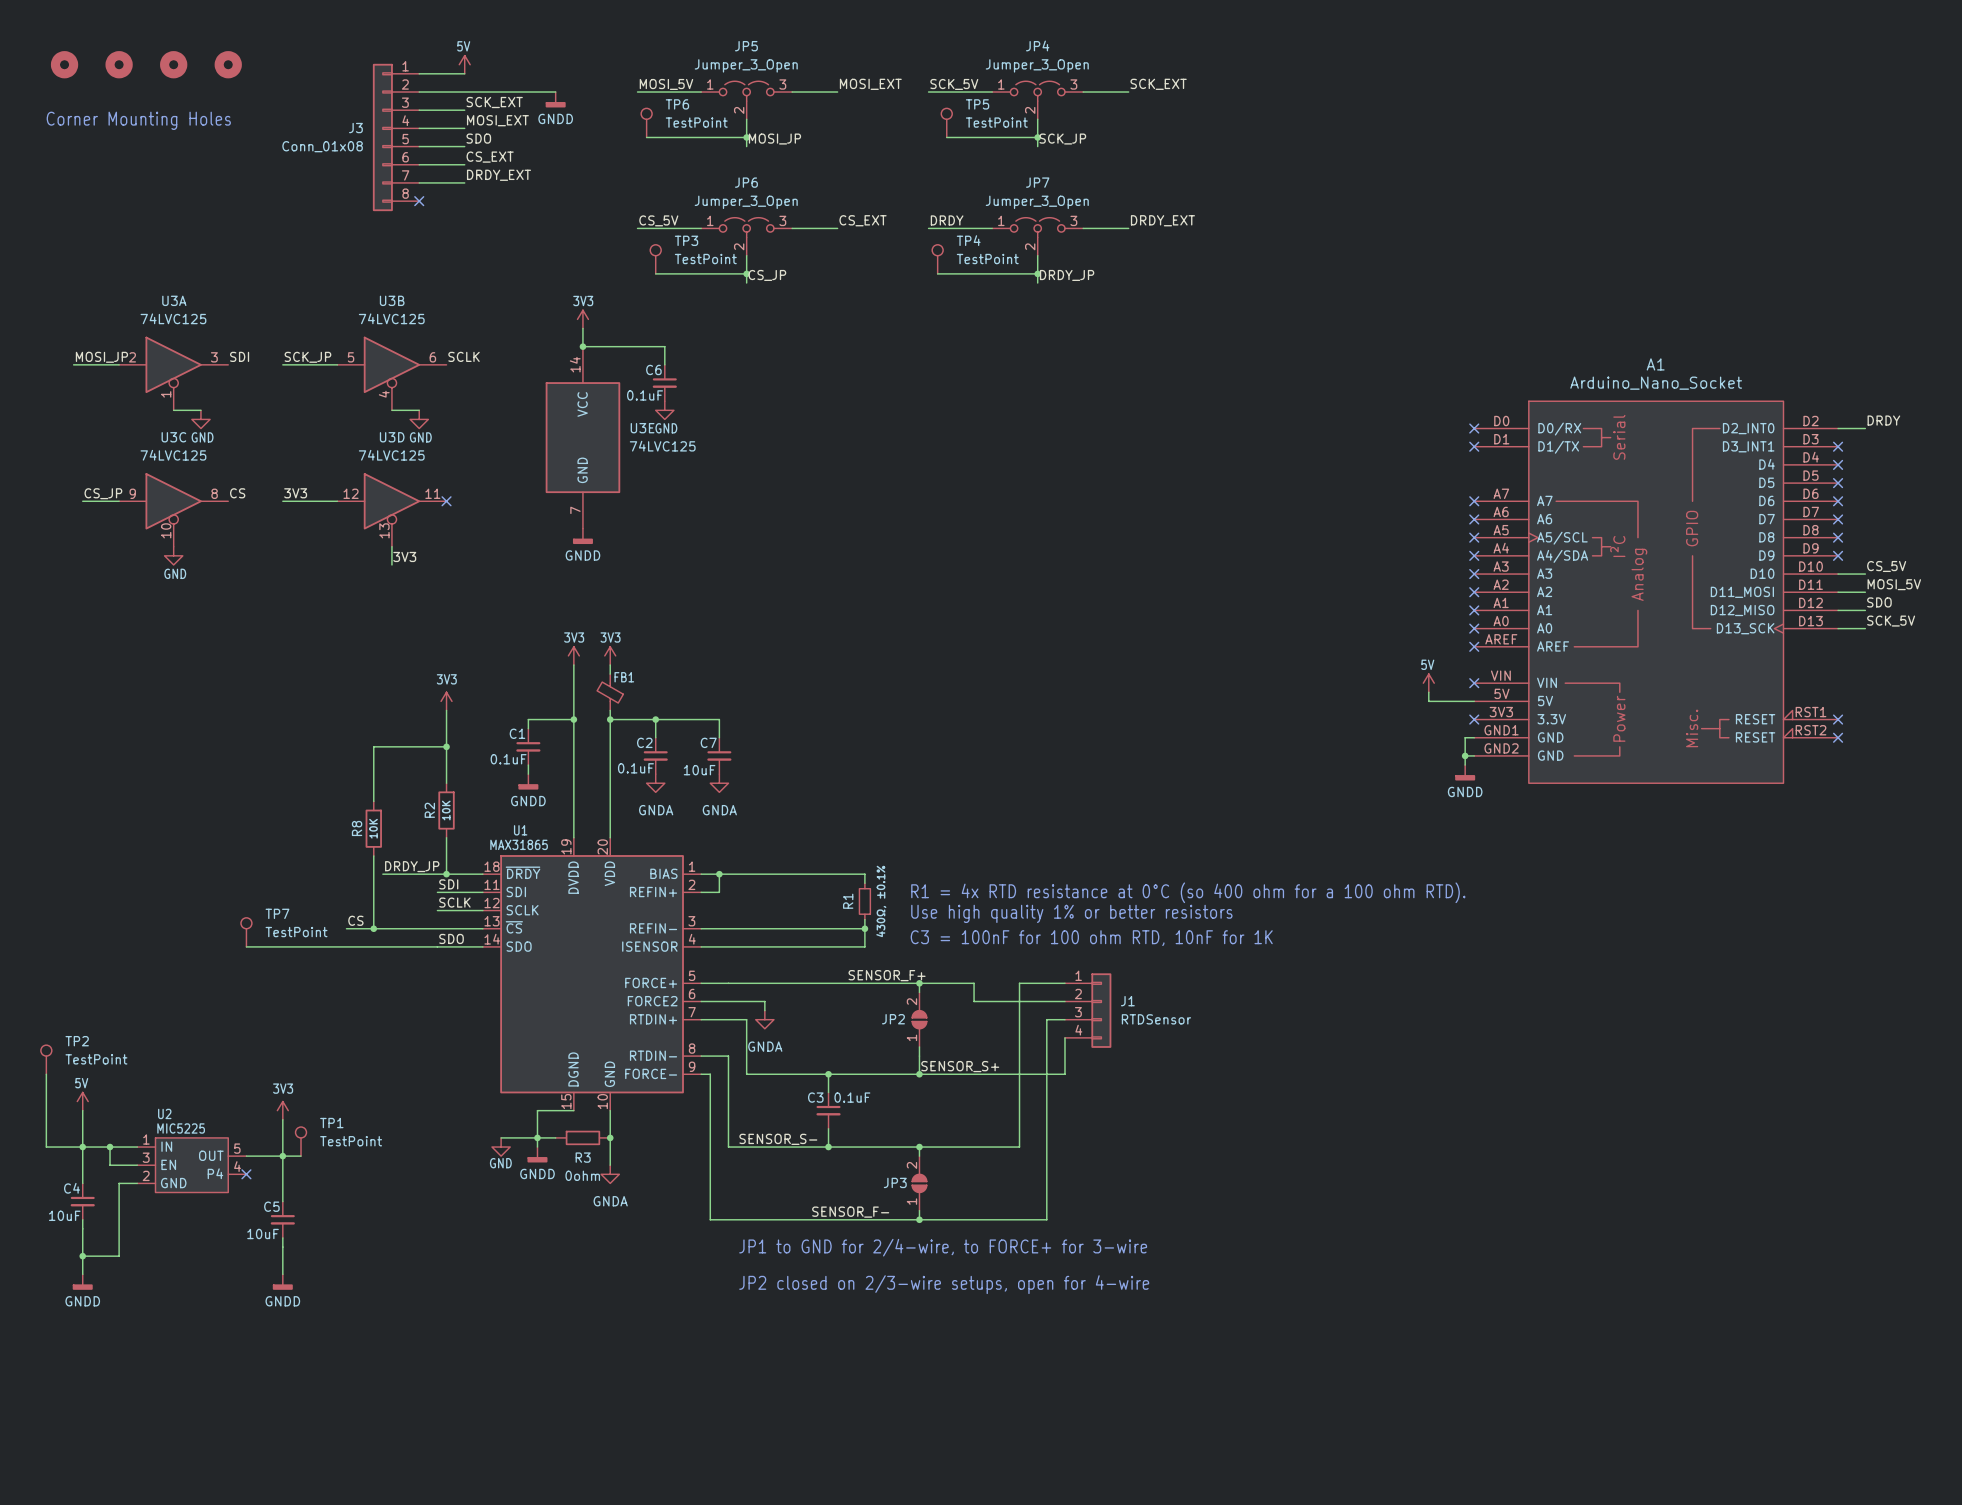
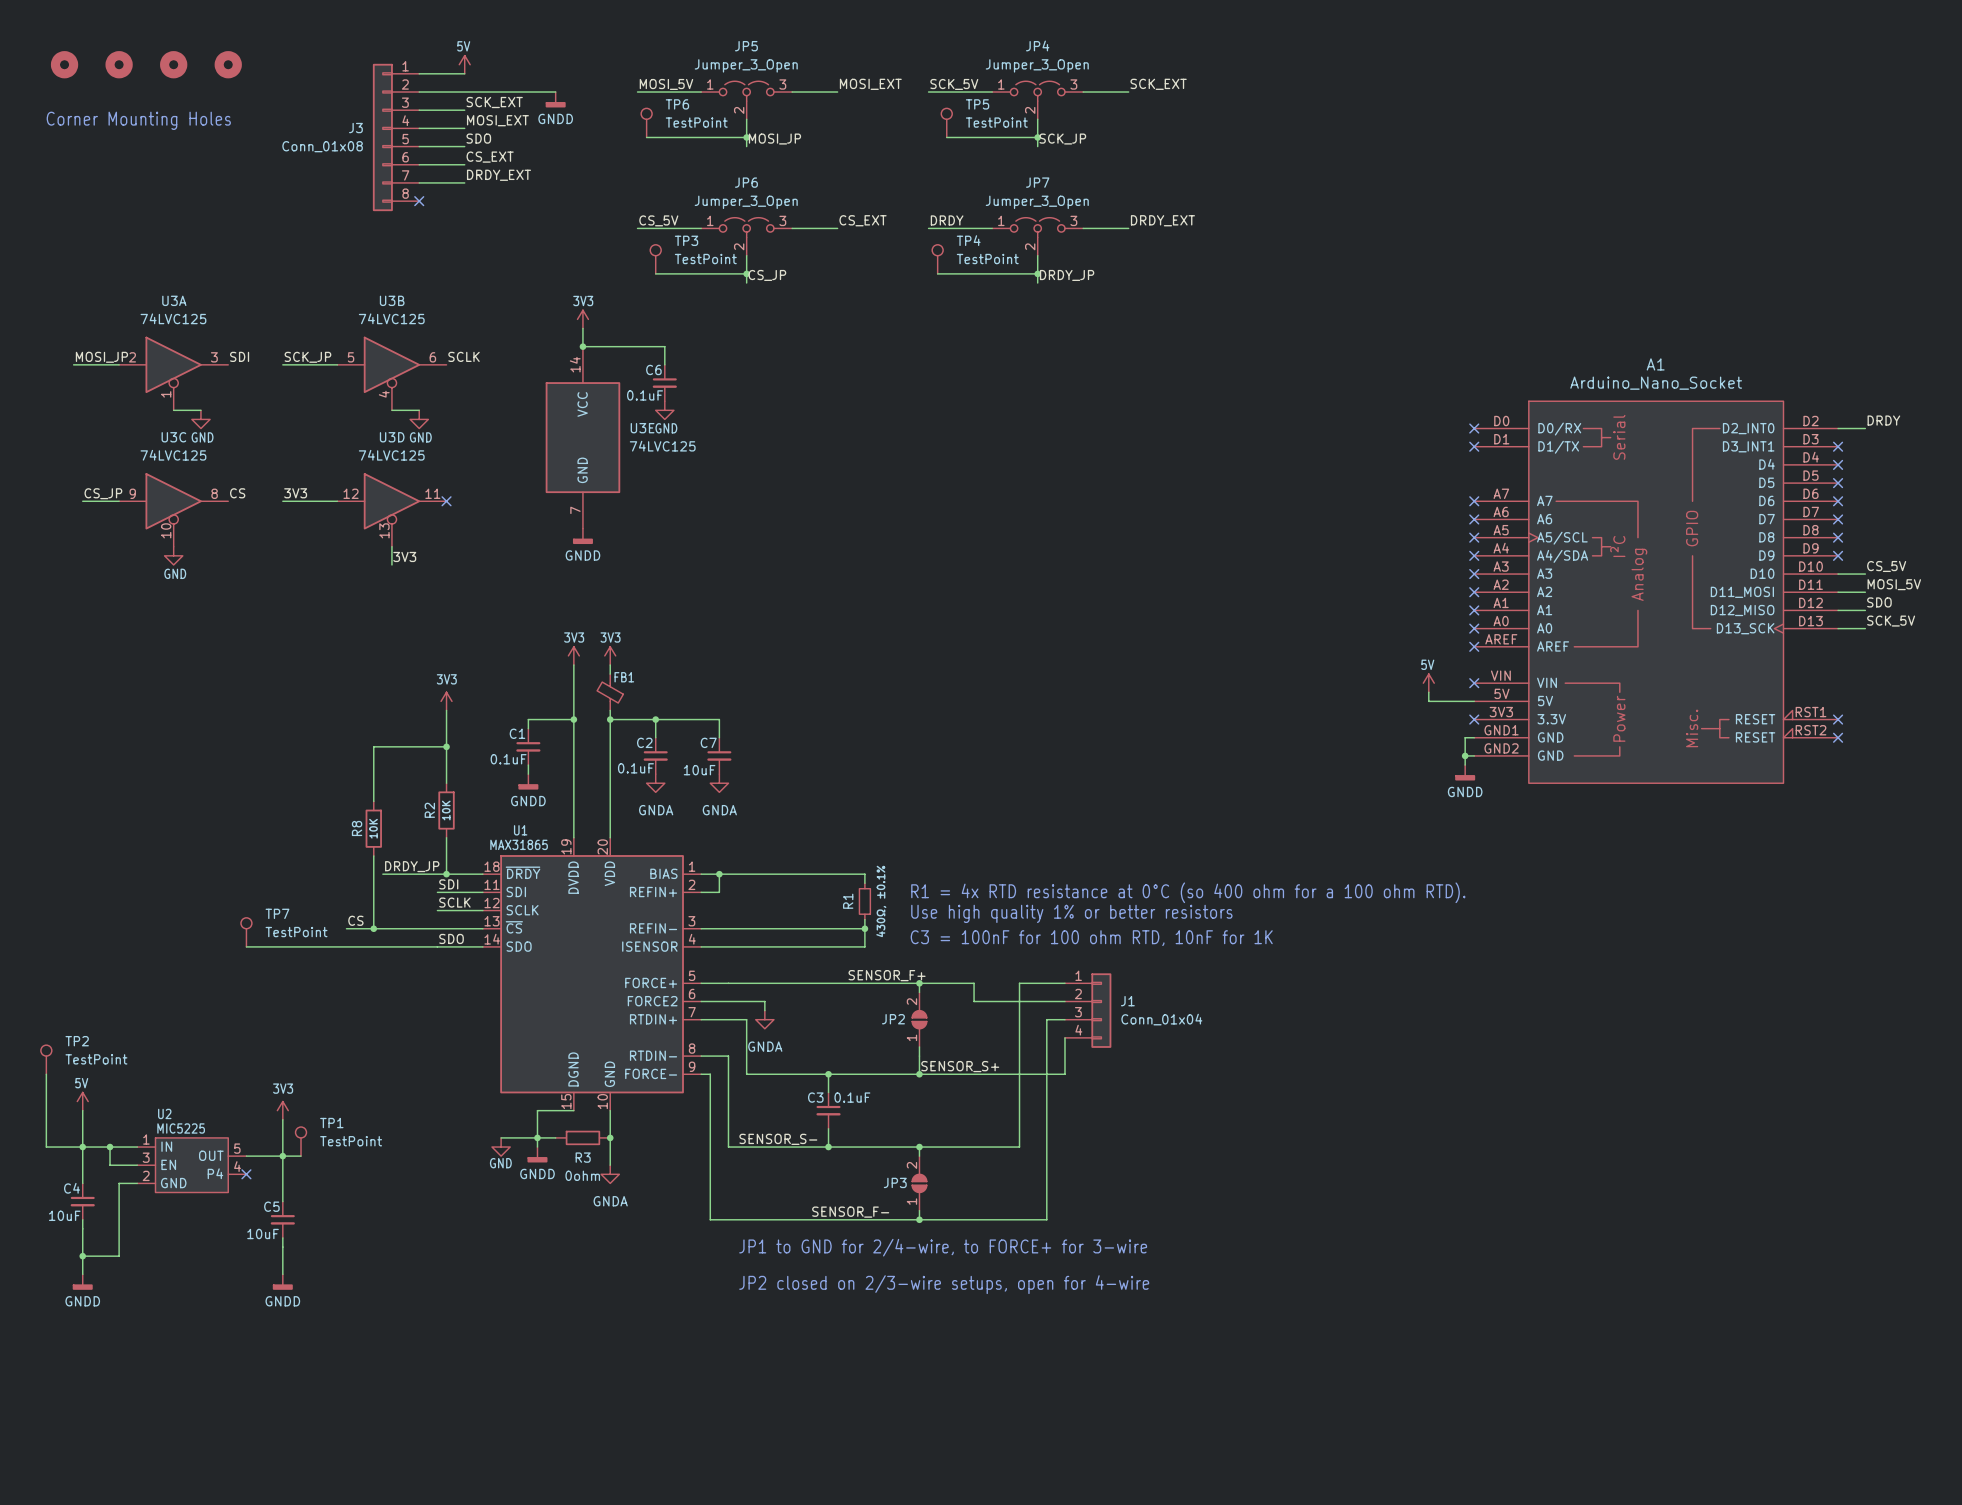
J1 value: RTDSensor (1156, 1019) -> Conn_01x04 (1161, 1019)

